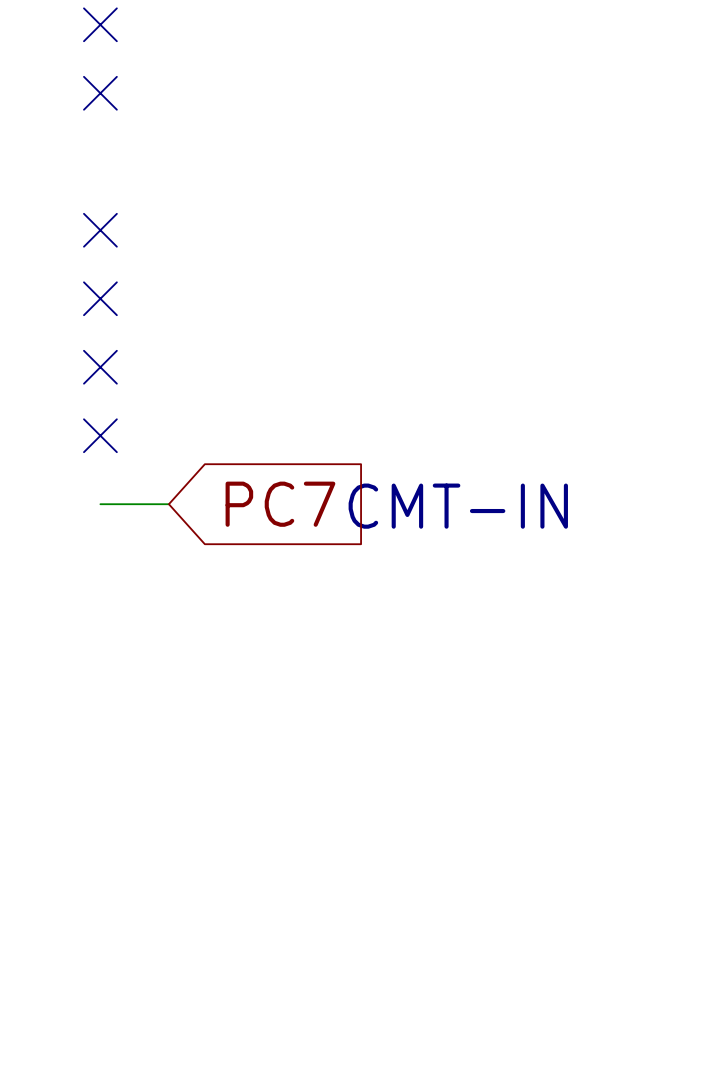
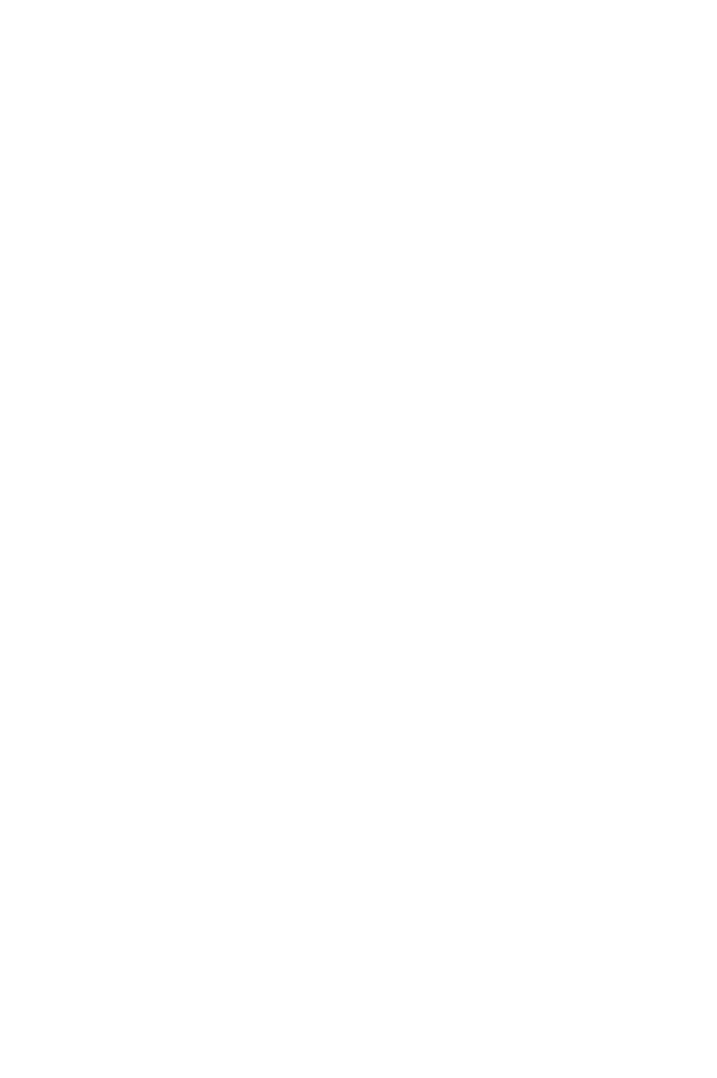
no-connect mark: (100, 24) -> none
no-connect mark: (100, 93) -> none
no-connect mark: (100, 230) -> none
no-connect mark: (100, 298) -> none
no-connect mark: (100, 367) -> none
no-connect mark: (100, 435) -> none
wire: (100, 504) (168, 504) -> none
global label: PC7 (280, 504) -> none
text: CMT-IN (458, 506) -> none

